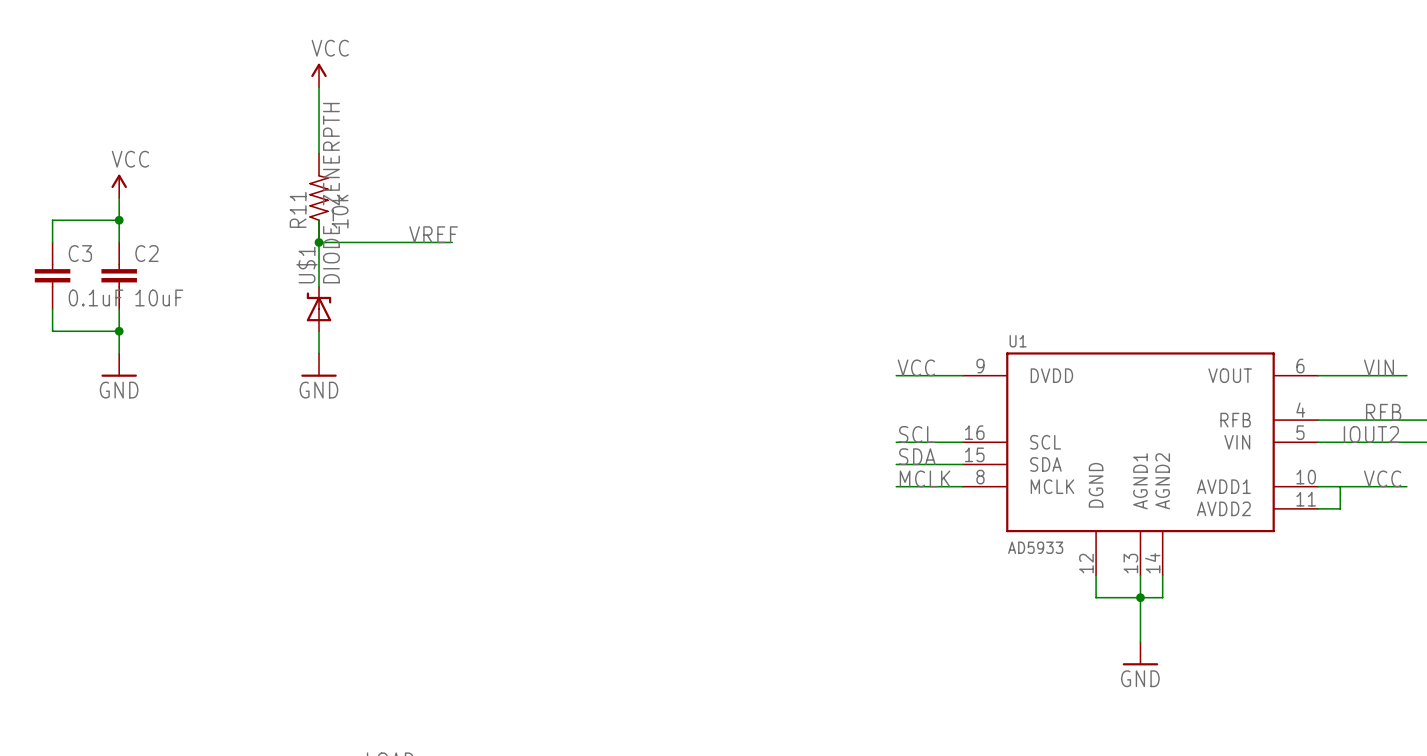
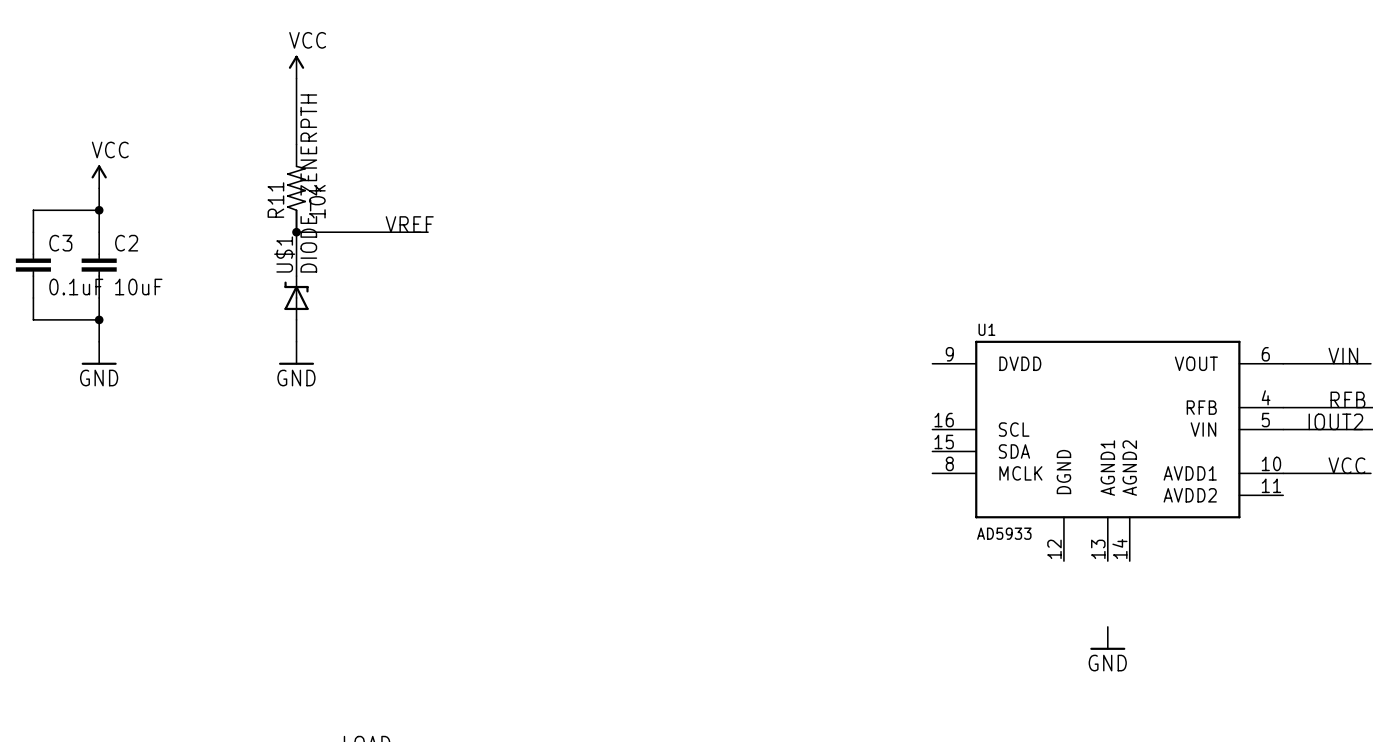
label: VCC (916, 367) -> none
wire: (896, 375) (962, 375) -> none
label: SCL (917, 434) -> none
wire: (896, 442) (962, 442) -> none
label: SDA (917, 456) -> none
wire: (896, 464) (962, 464) -> none
label: MCLK (925, 478) -> none
wire: (896, 486) (962, 486) -> none
wire: (1340, 486) (1340, 508) (1318, 508) -> none
wire: (1096, 575) (1096, 597) (1162, 597) (1162, 575) -> none
wire: (1140, 575) (1140, 642) -> none
junction: (1140, 597) -> none

